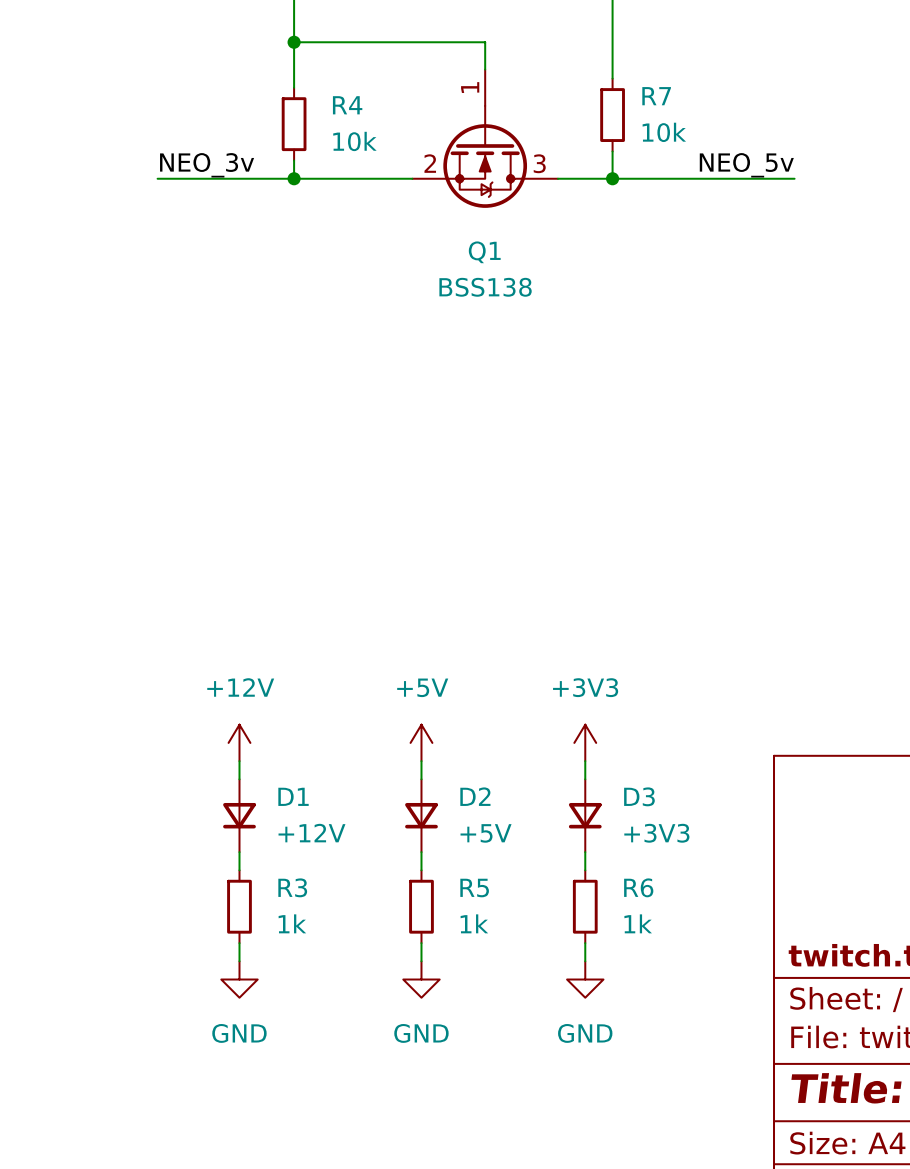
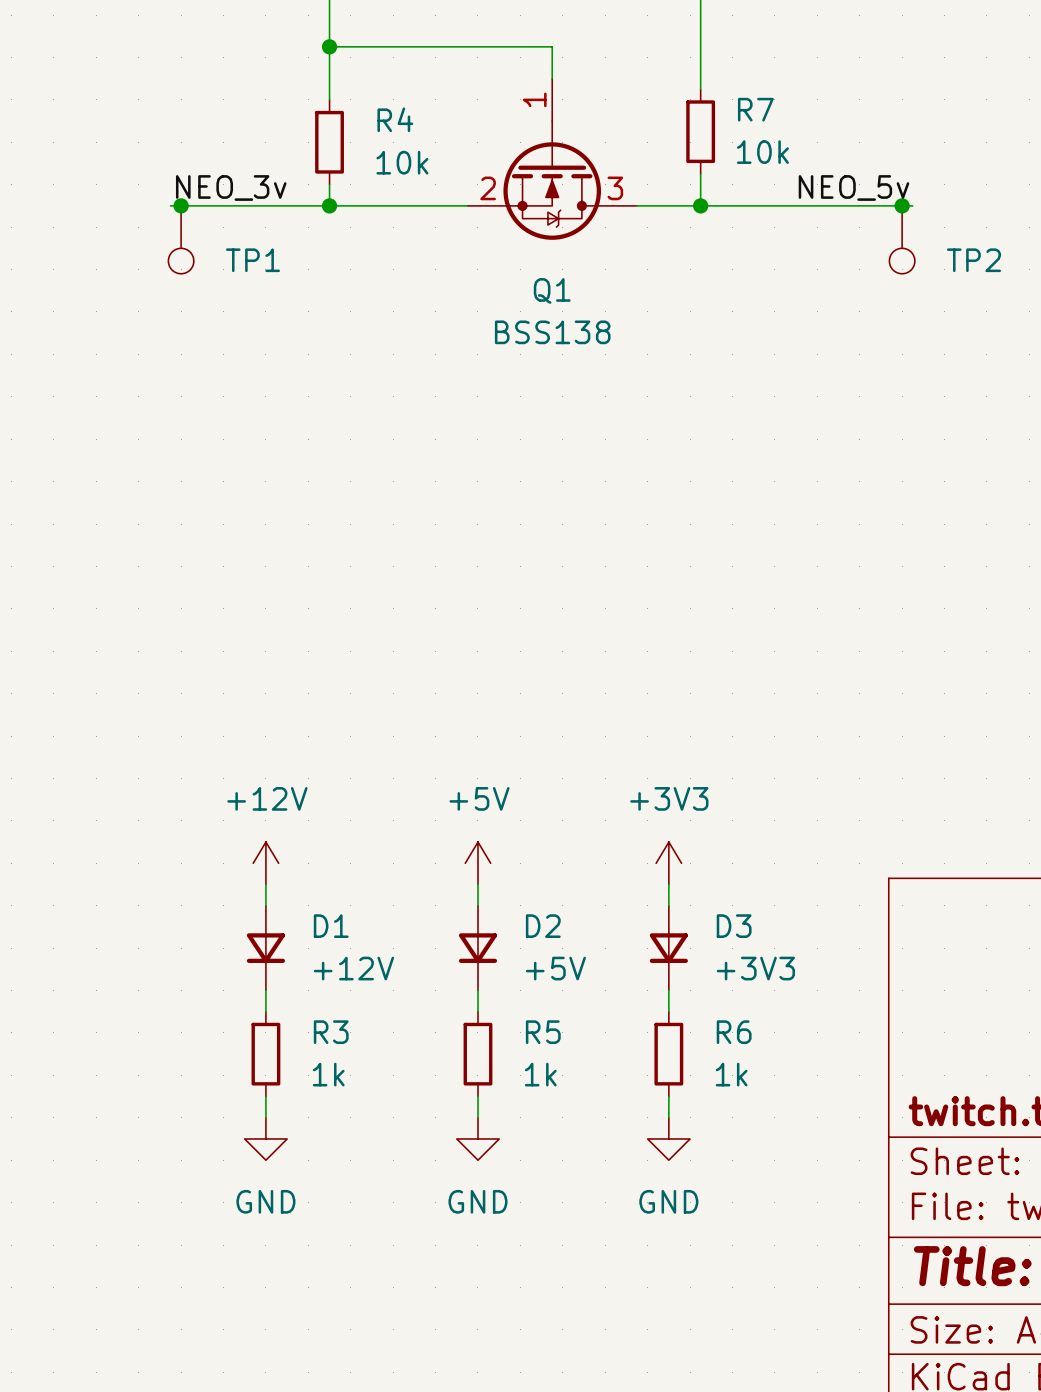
junction: none -> (181, 205)
junction: none -> (902, 205)
TP1: none -> (181, 239)
TP2: none -> (902, 239)

